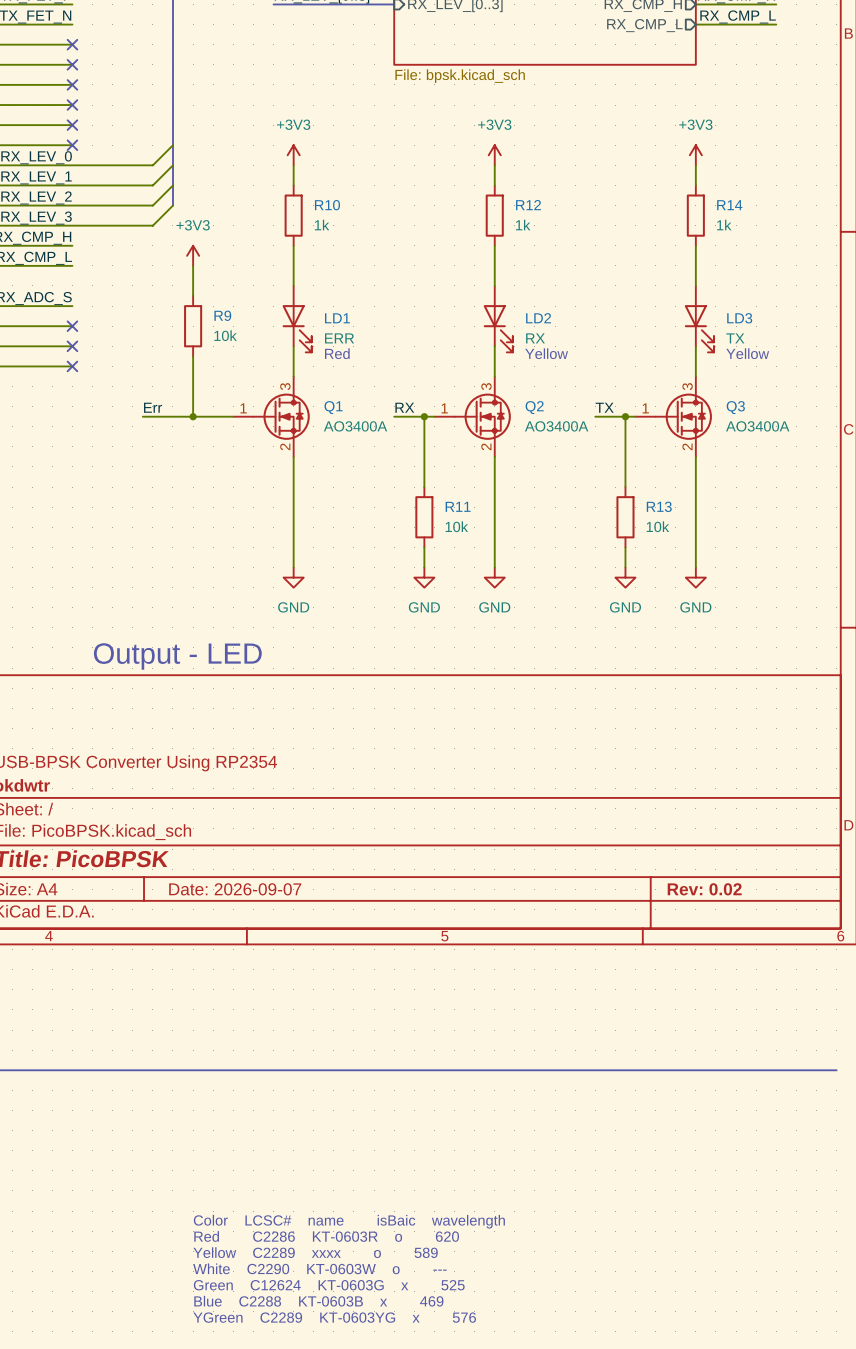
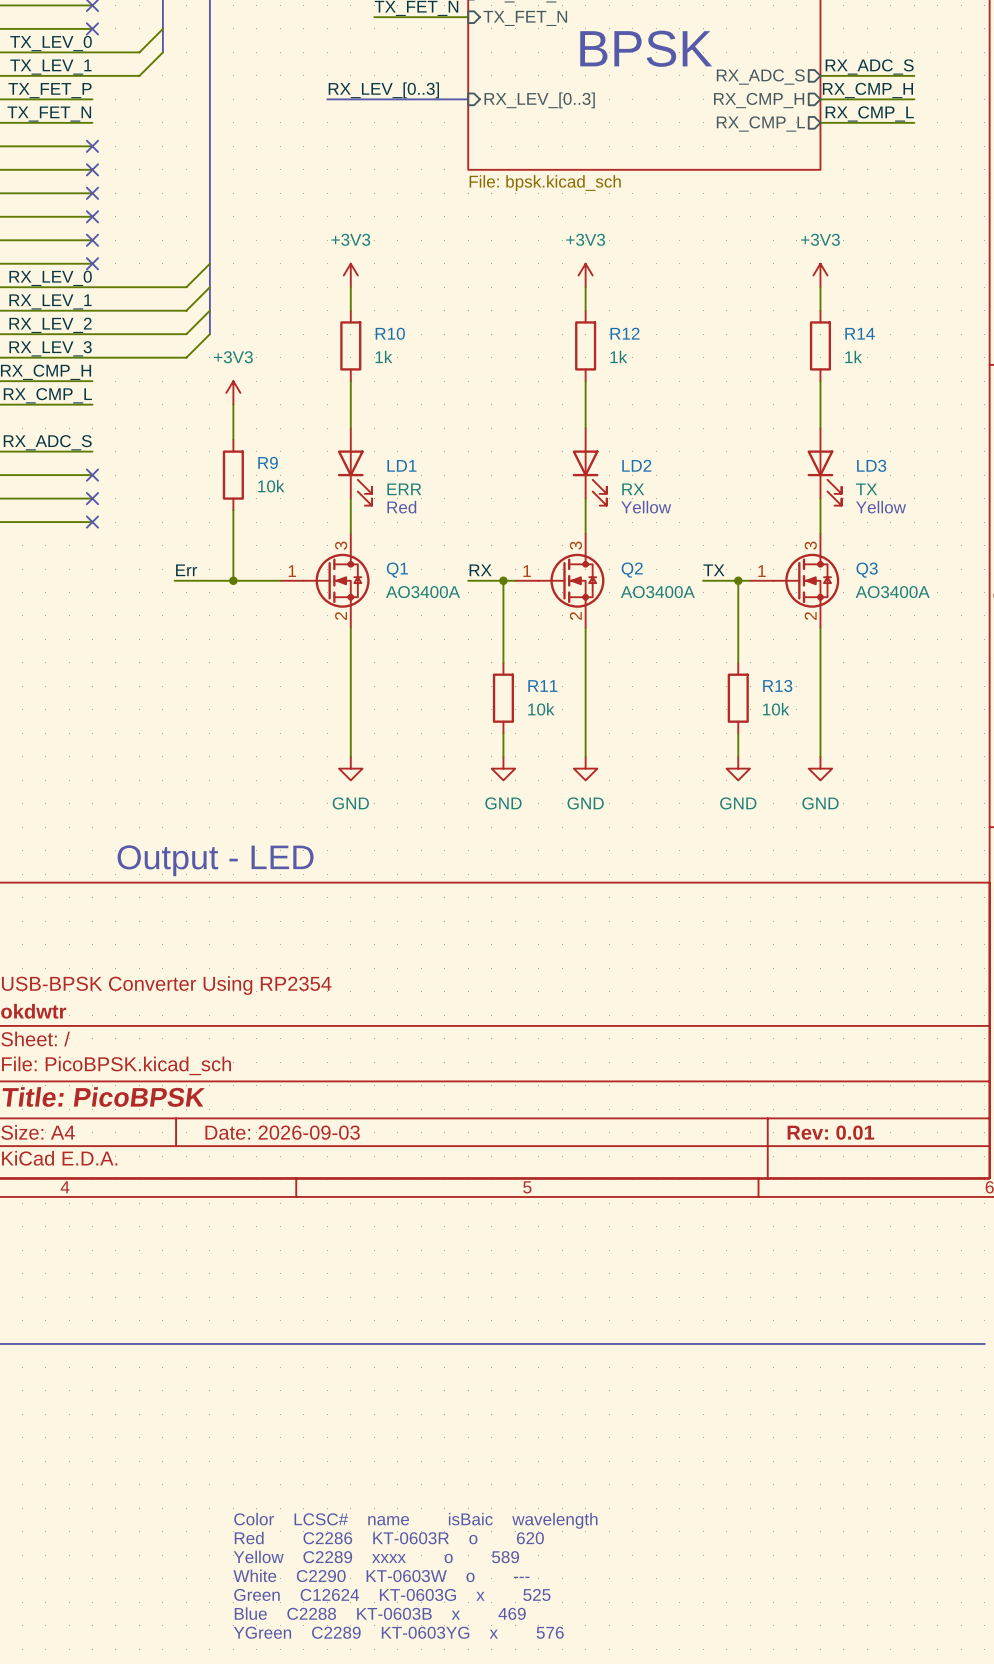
title block: Date: 2026-09-07 (235, 889) -> Date: 2026-09-03 (282, 1132)
title block: Rev: 0.02 (704, 889) -> Rev: 0.01 (830, 1132)

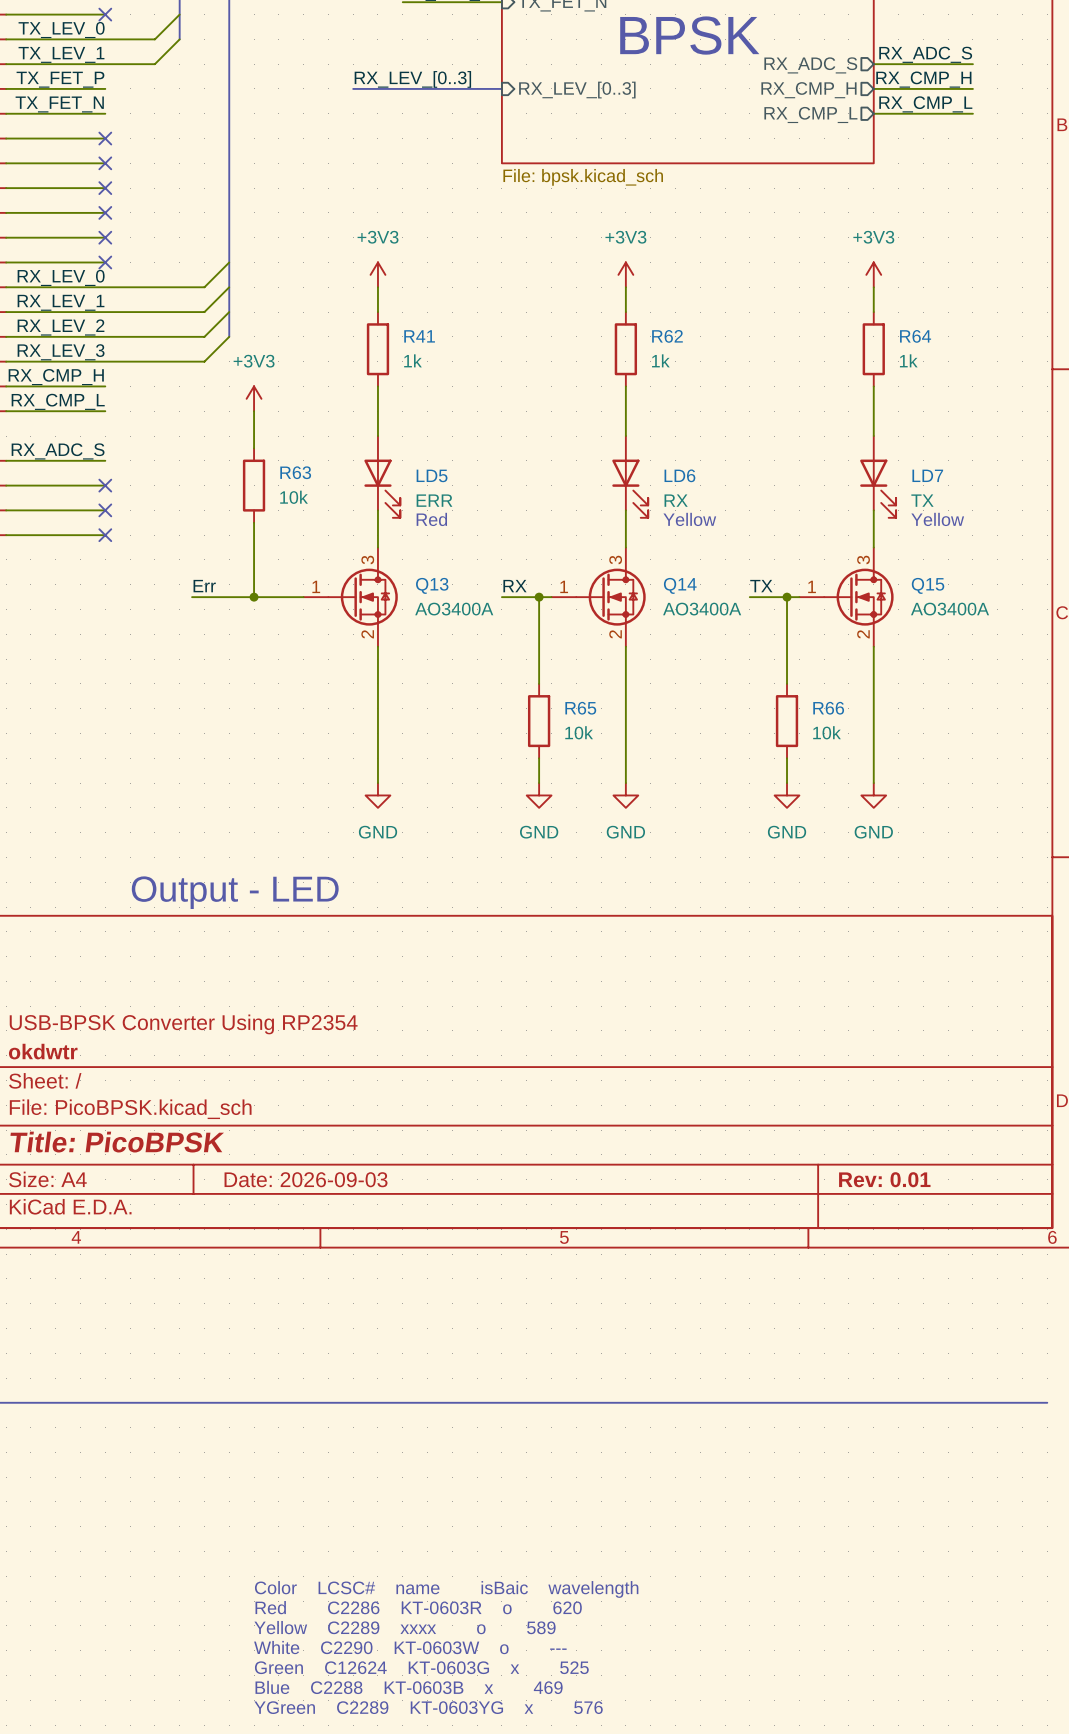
R10 name: R10 (390, 333) -> R41 (419, 336)
R12 name: R12 (625, 333) -> R62 (667, 336)
R14 name: R14 (860, 333) -> R64 (915, 336)
R9 name: R9 (268, 462) -> R63 (295, 472)
LD1 name: LD1 (401, 465) -> LD5 (432, 475)
LD2 name: LD2 (636, 465) -> LD6 (679, 475)
LD3 name: LD3 (871, 465) -> LD7 (927, 475)
Q1 name: Q1 (397, 570) -> Q13 (432, 585)
Q2 name: Q2 (632, 570) -> Q14 (680, 585)
Q3 name: Q3 (867, 570) -> Q15 (928, 585)
R11 name: R11 (542, 686) -> R65 (580, 708)
R13 name: R13 (777, 686) -> R66 (828, 708)

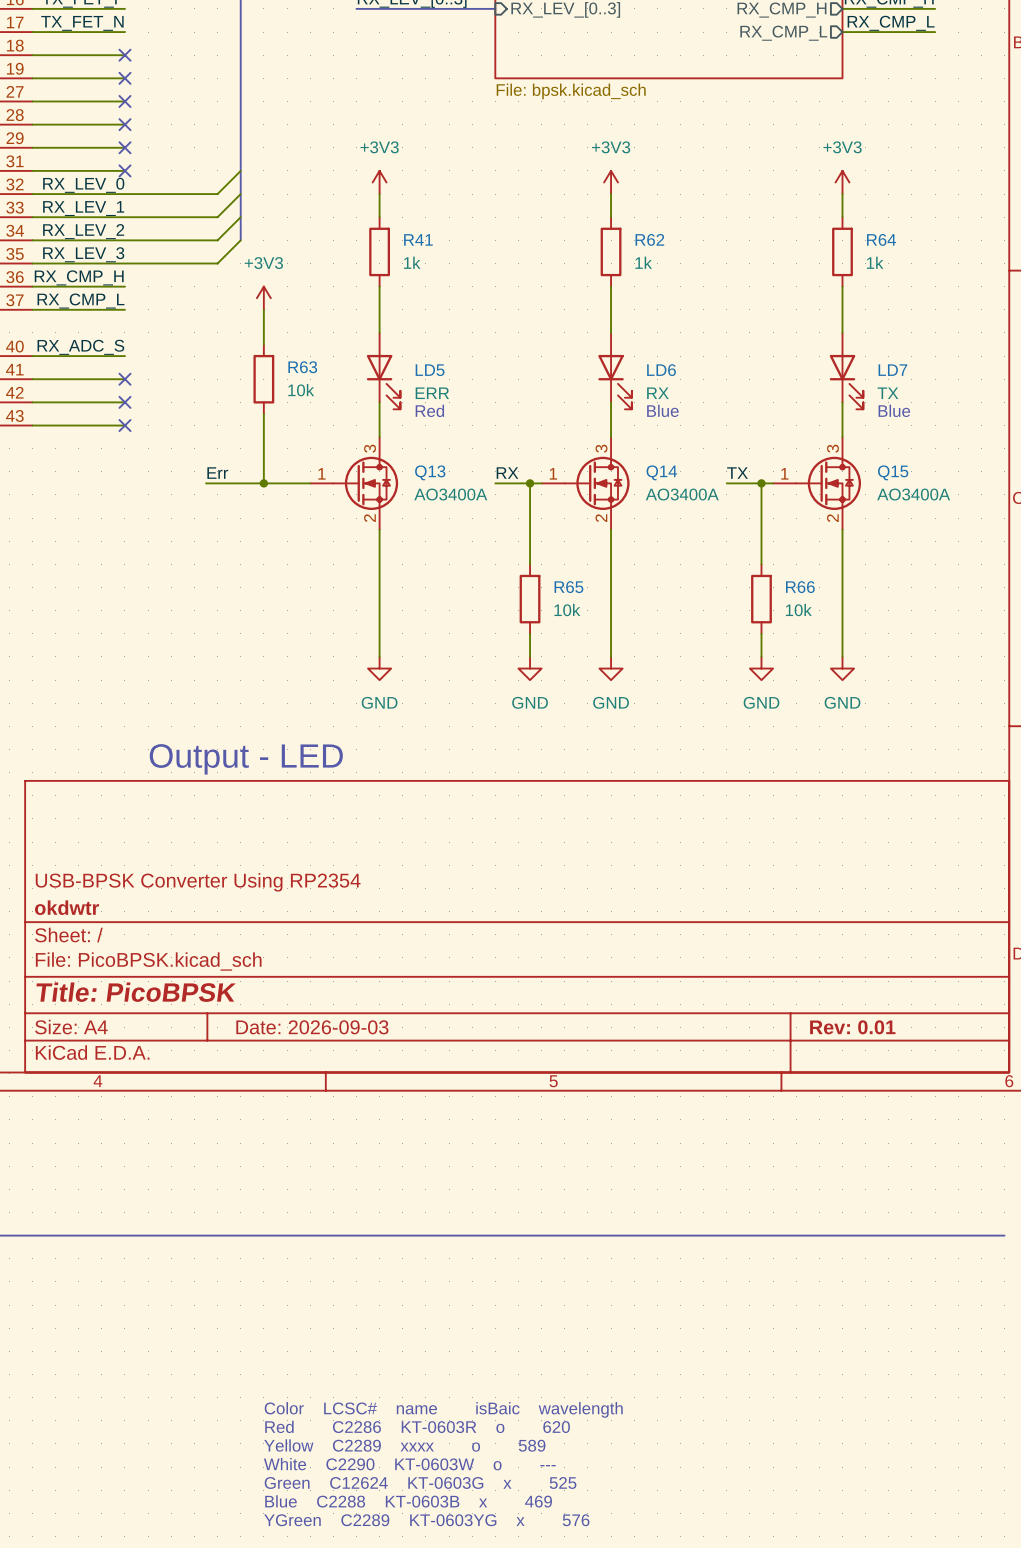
text: Yellow (689, 519) -> Blue (662, 410)
text: Yellow (937, 519) -> Blue (894, 410)

